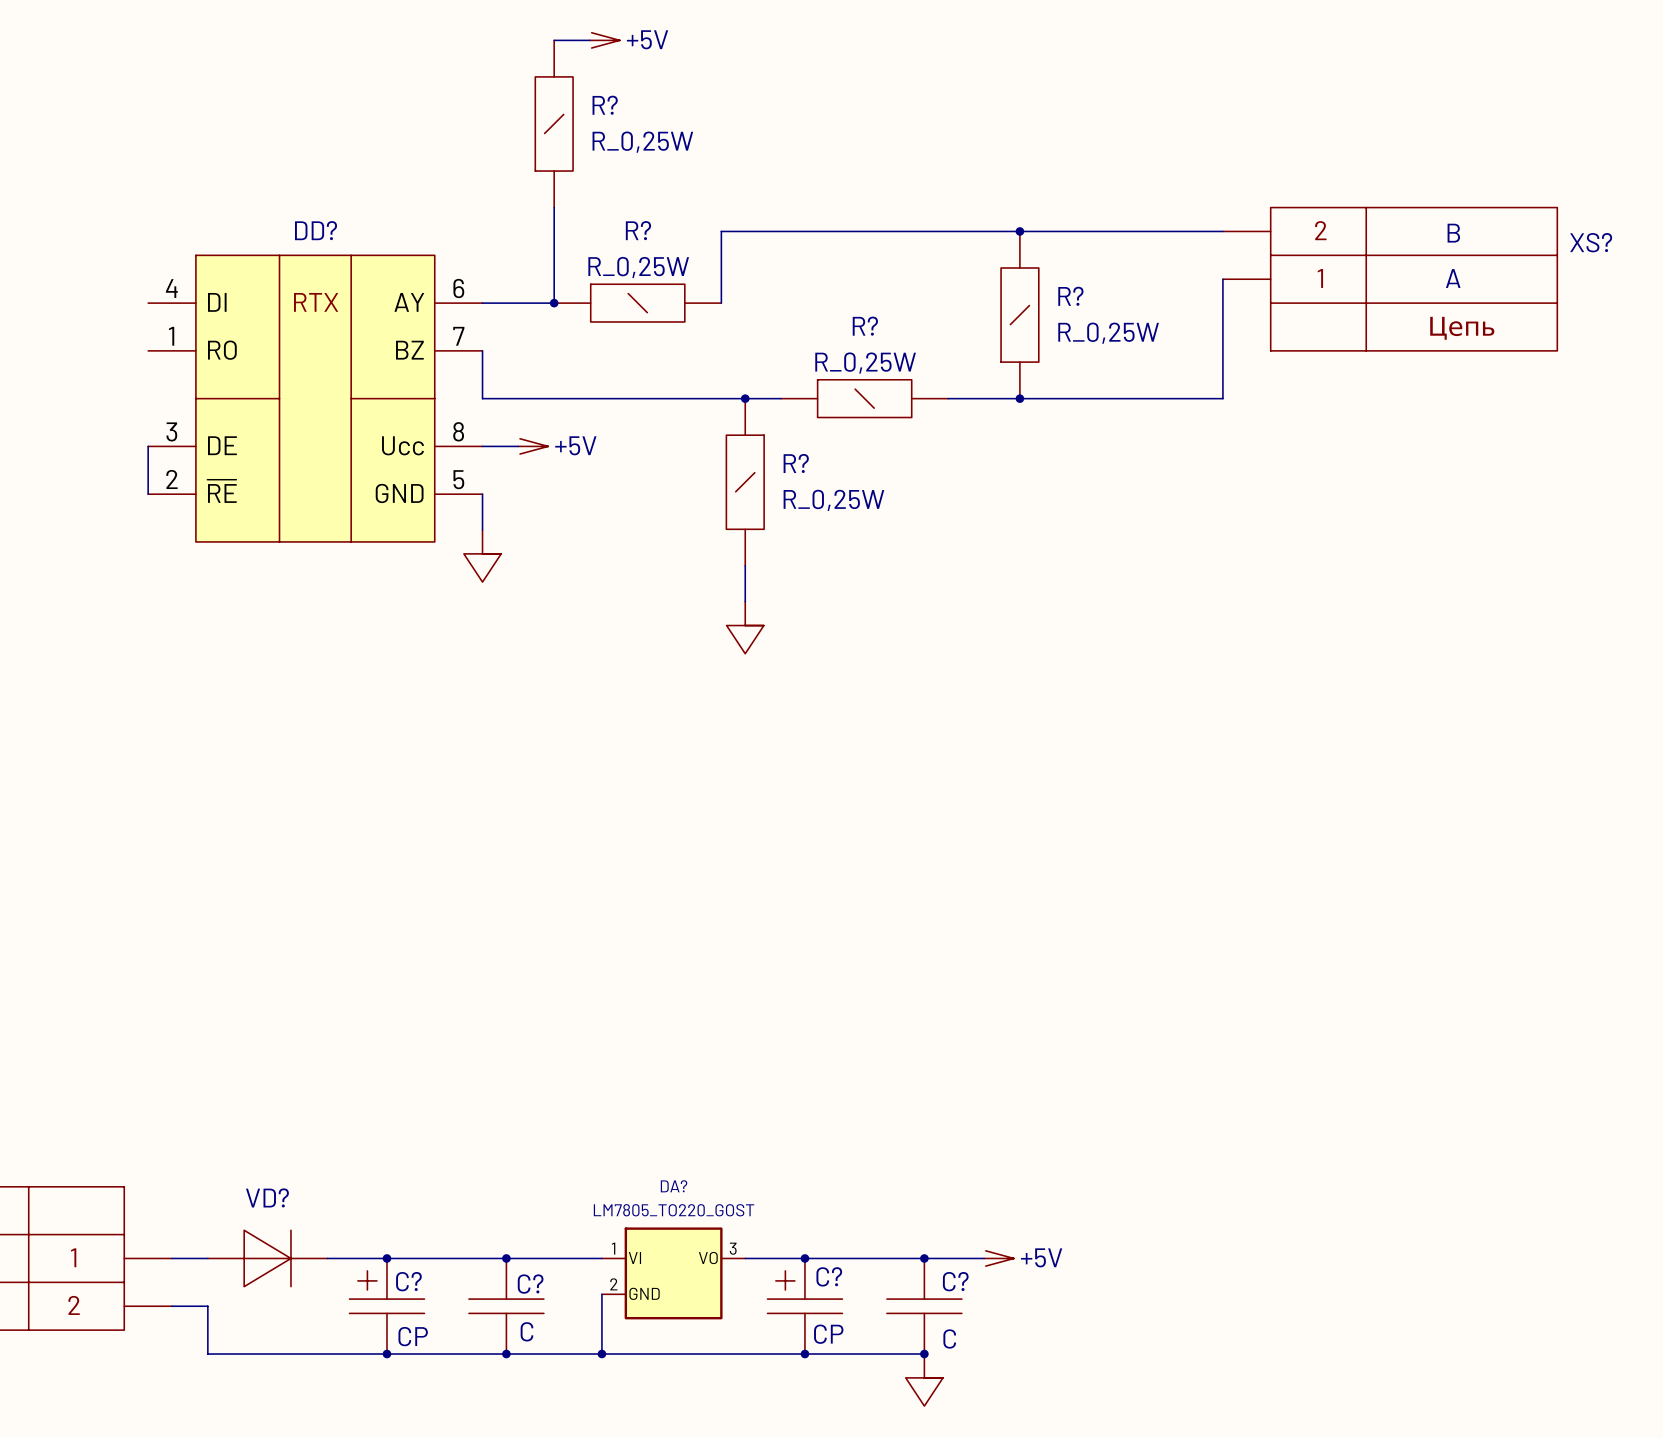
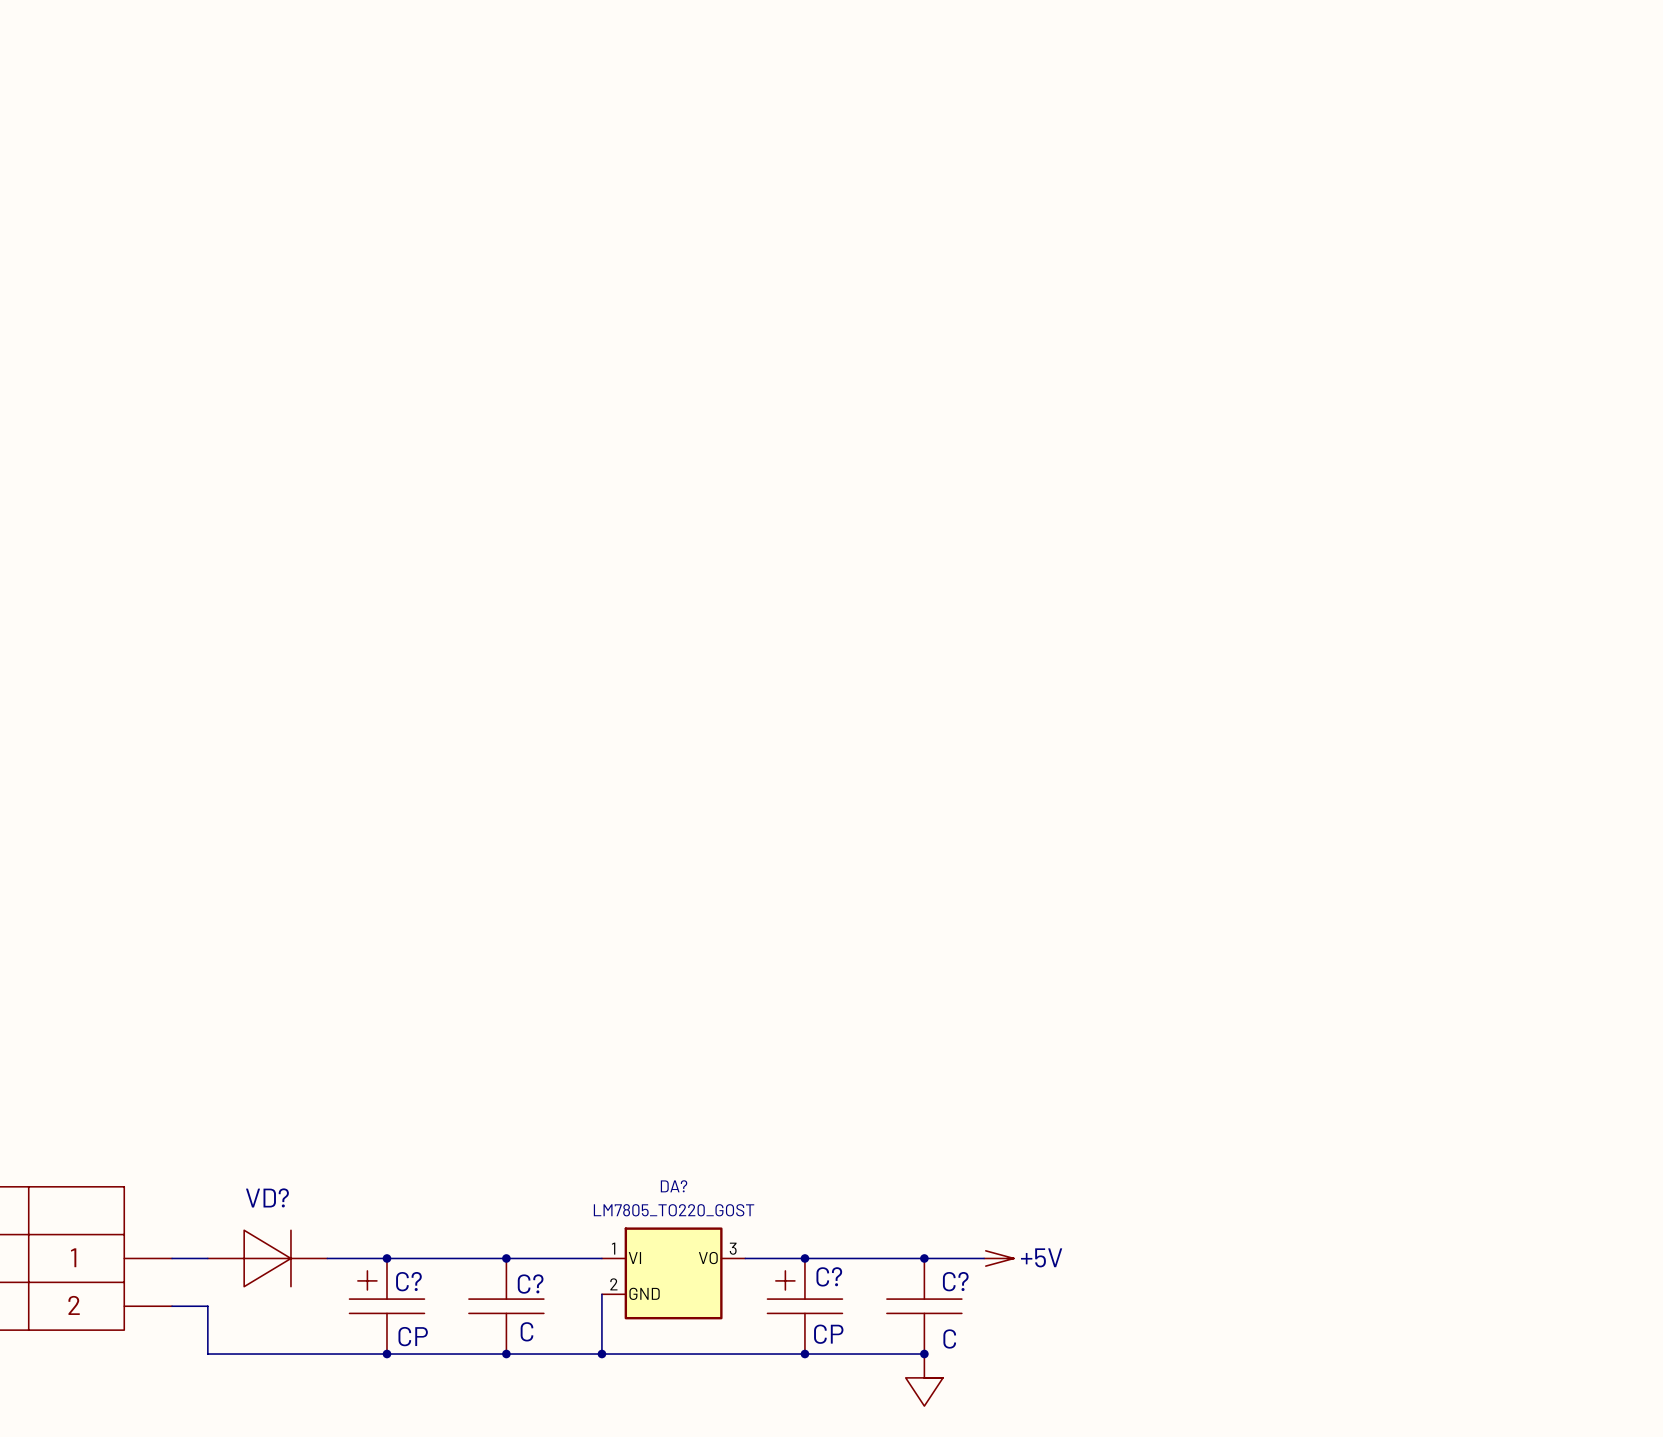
wire: (554, 40) (590, 40) -> none
power symbol: +5V (604, 40) -> none
R?: R_0,25W (554, 123) -> none
wire: (554, 207) (554, 303) (482, 303) -> none
junction: (1019, 231) -> none
wire: (1222, 231) (721, 231) (721, 303) -> none
wire: (1222, 279) (1222, 398) (948, 398) -> none
XS?: (1390, 279) -> none
junction: (554, 303) -> none
R?: R_0,25W (637, 303) -> none
R?: R_0,25W (1019, 315) -> none
wire: (482, 350) (482, 398) (781, 398) -> none
DD?: (315, 398) -> none
junction: (745, 398) -> none
R?: R_0,25W (864, 398) -> none
junction: (1019, 398) -> none
wire: (148, 446) (148, 494) -> none
wire: (482, 446) (518, 446) -> none
power symbol: +5V (533, 446) -> none
R?: R_0,25W (745, 482) -> none
wire: (482, 494) (482, 530) -> none
power symbol: (482, 556) -> none
wire: (745, 565) (745, 601) -> none
power symbol: (745, 627) -> none

